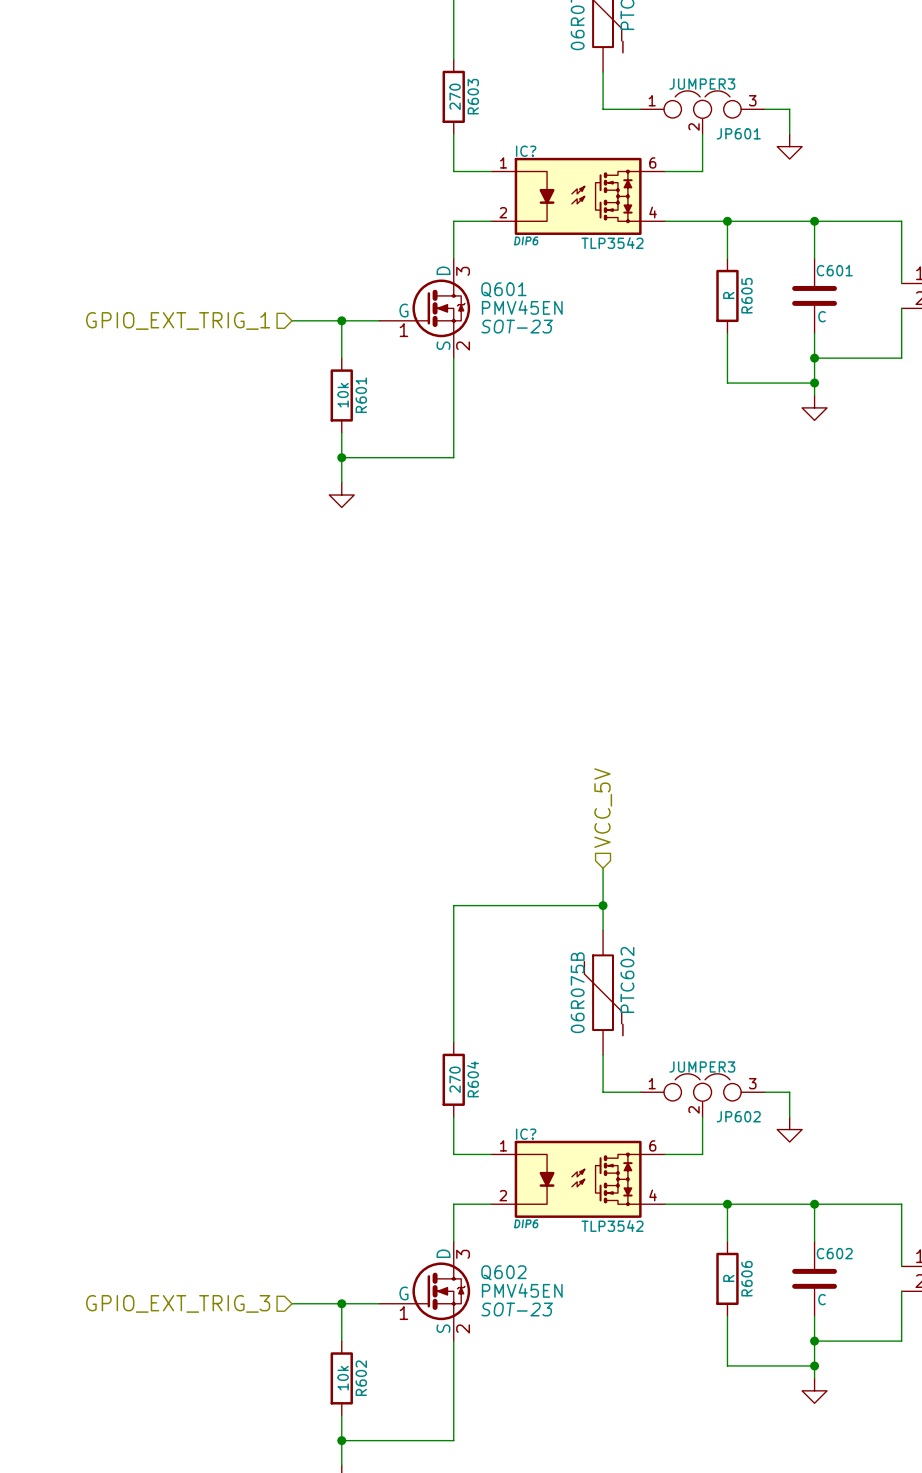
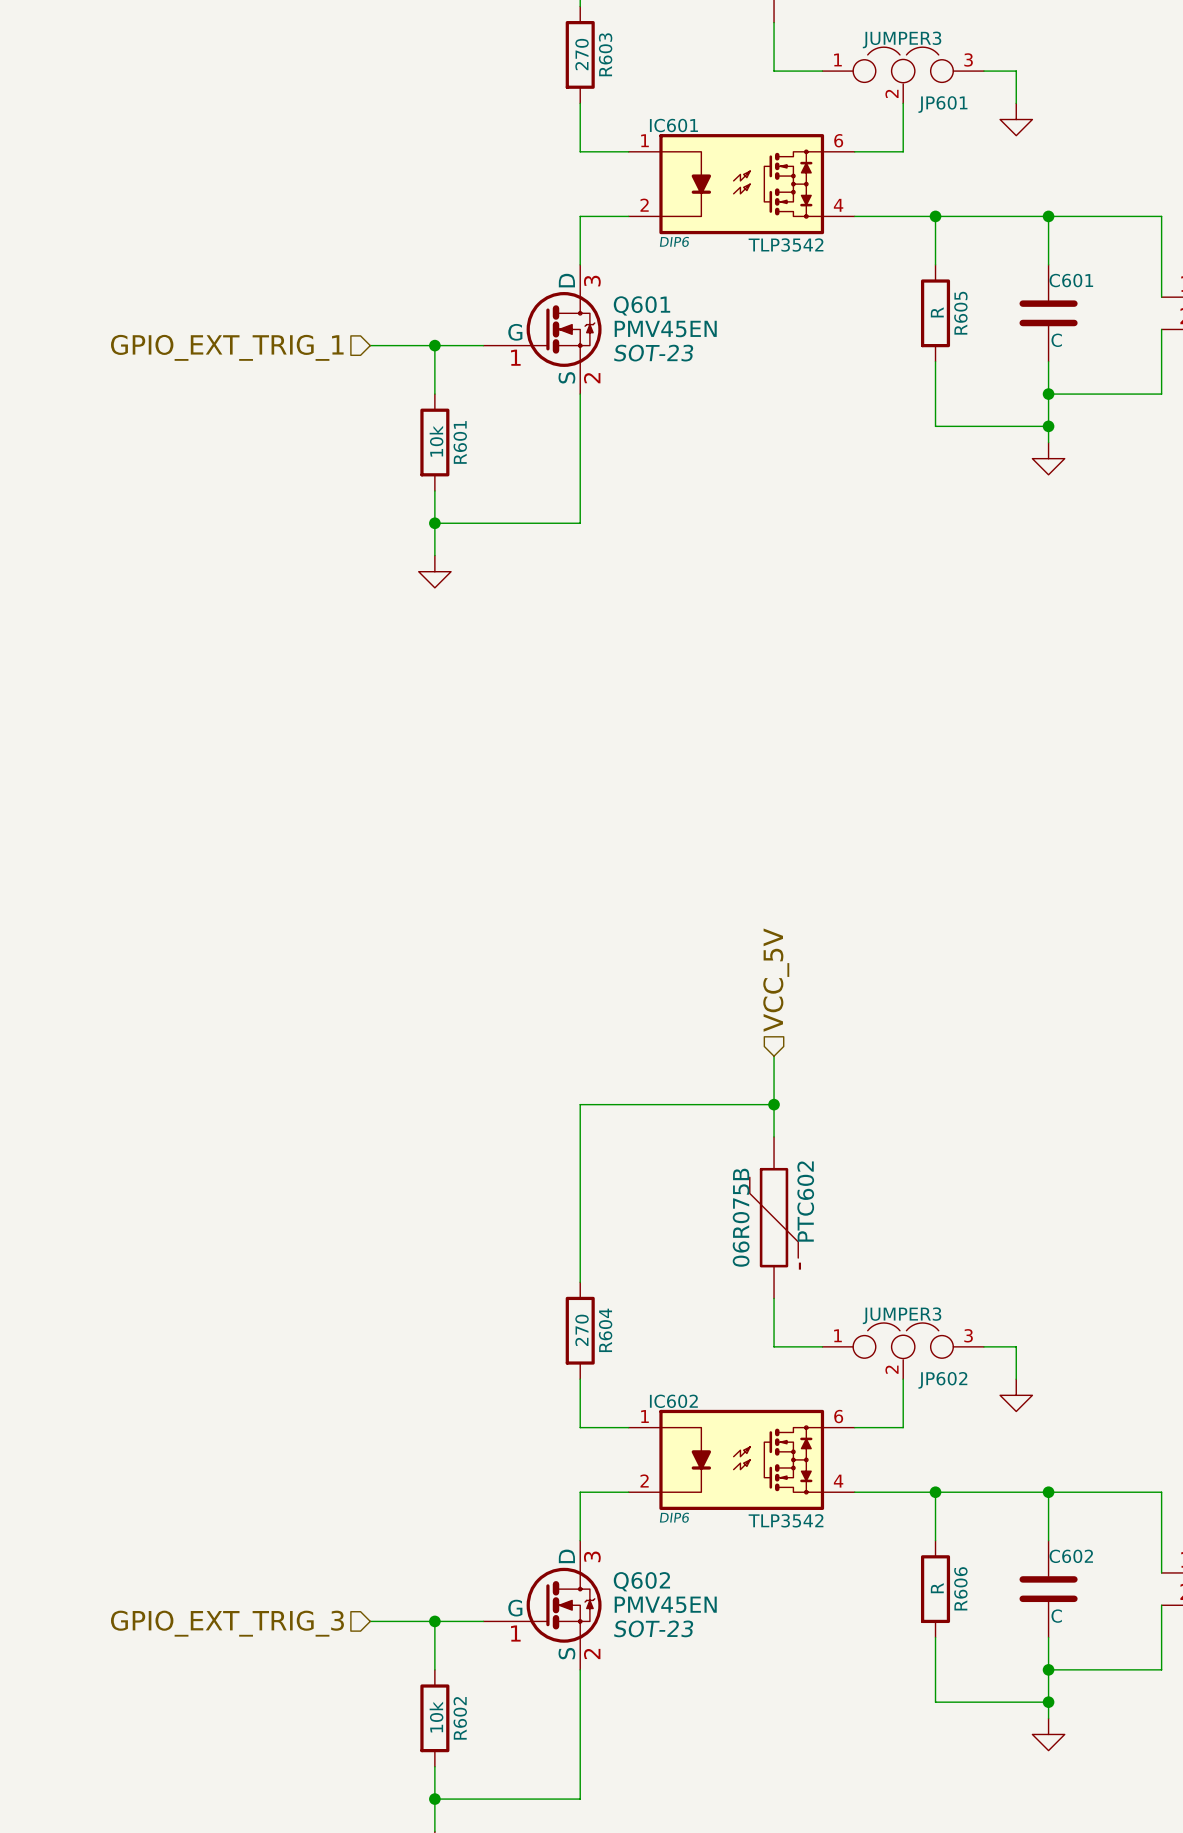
IC? name: IC? (526, 151) -> IC601 (673, 125)
IC? name: IC? (526, 1134) -> IC602 (673, 1401)

